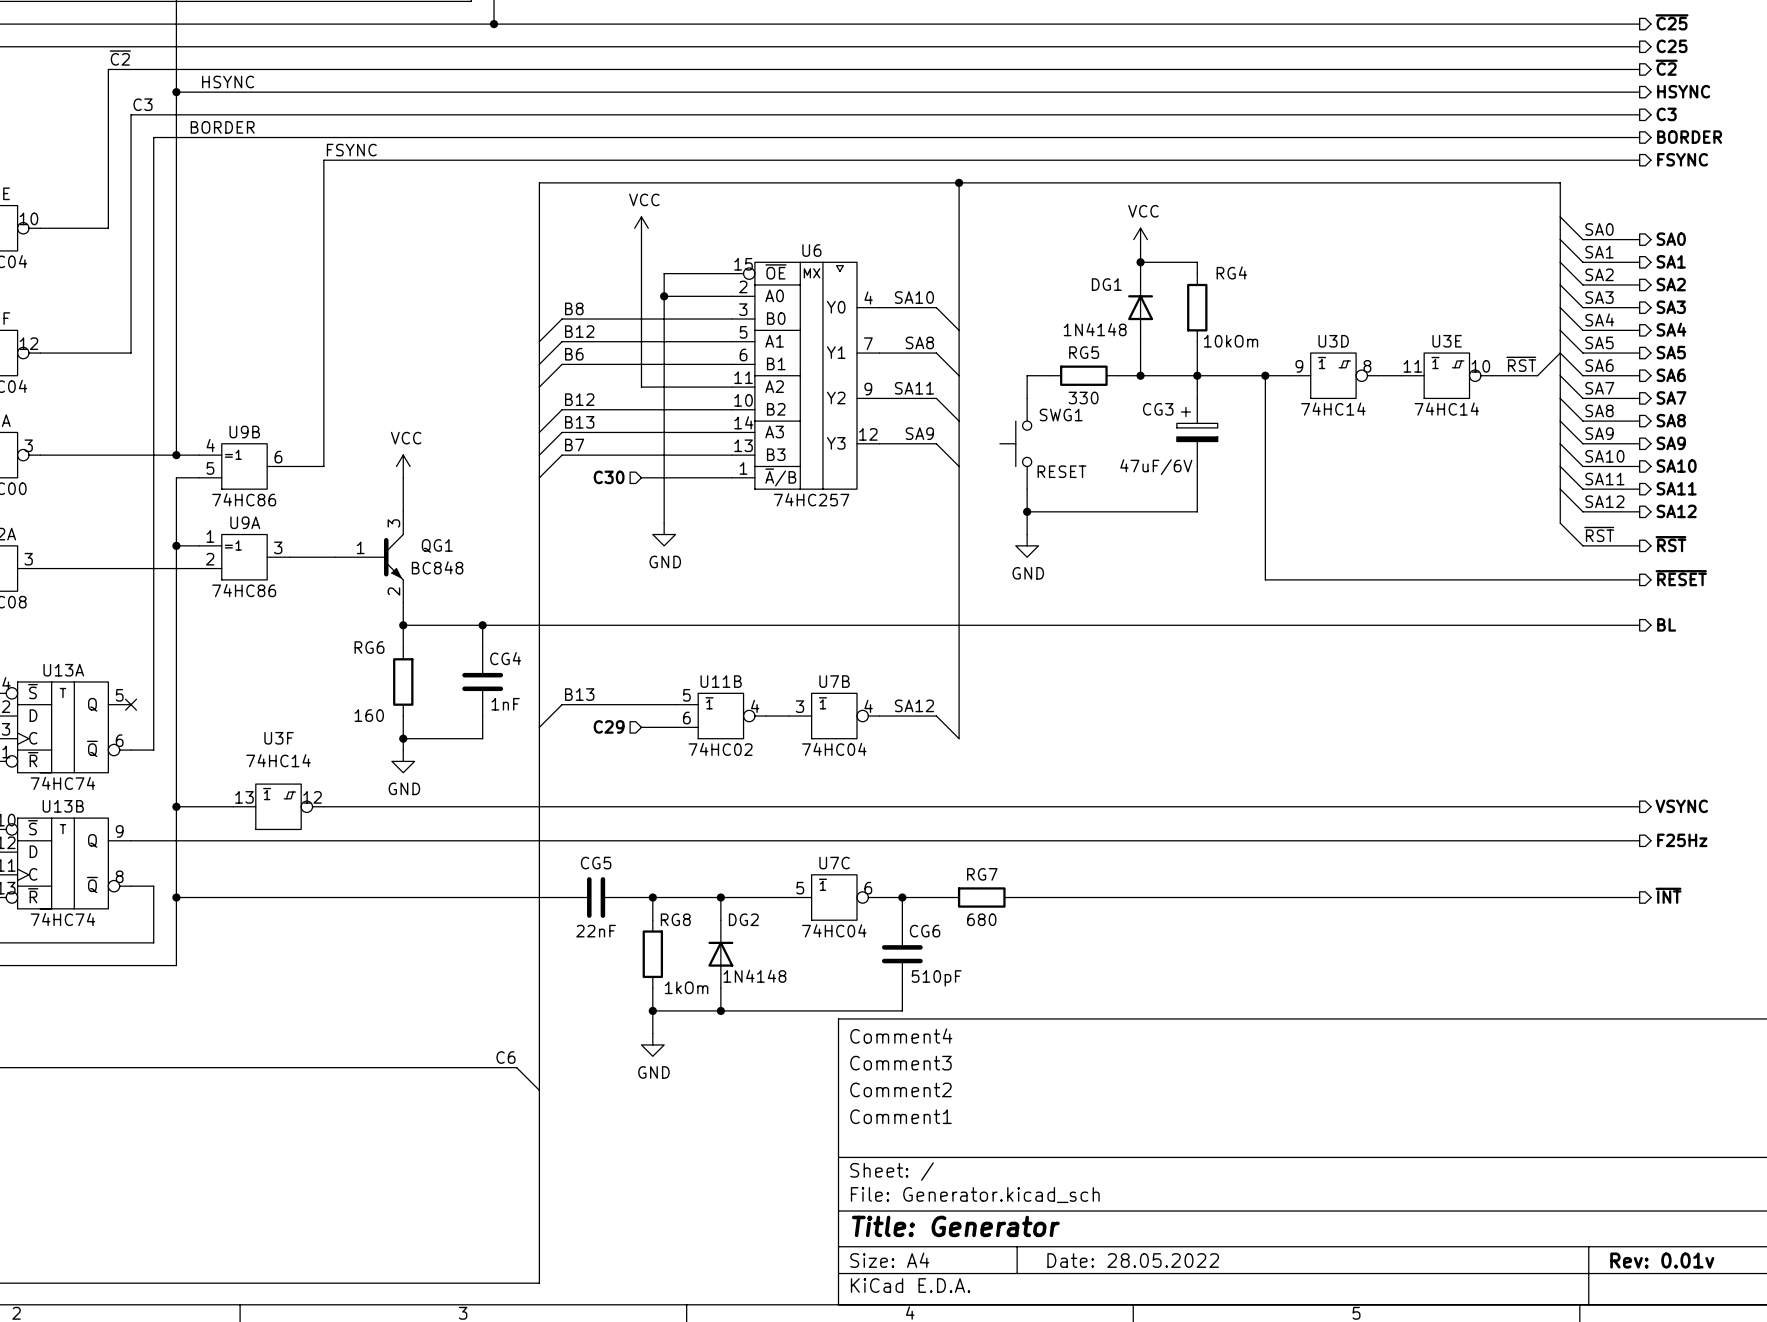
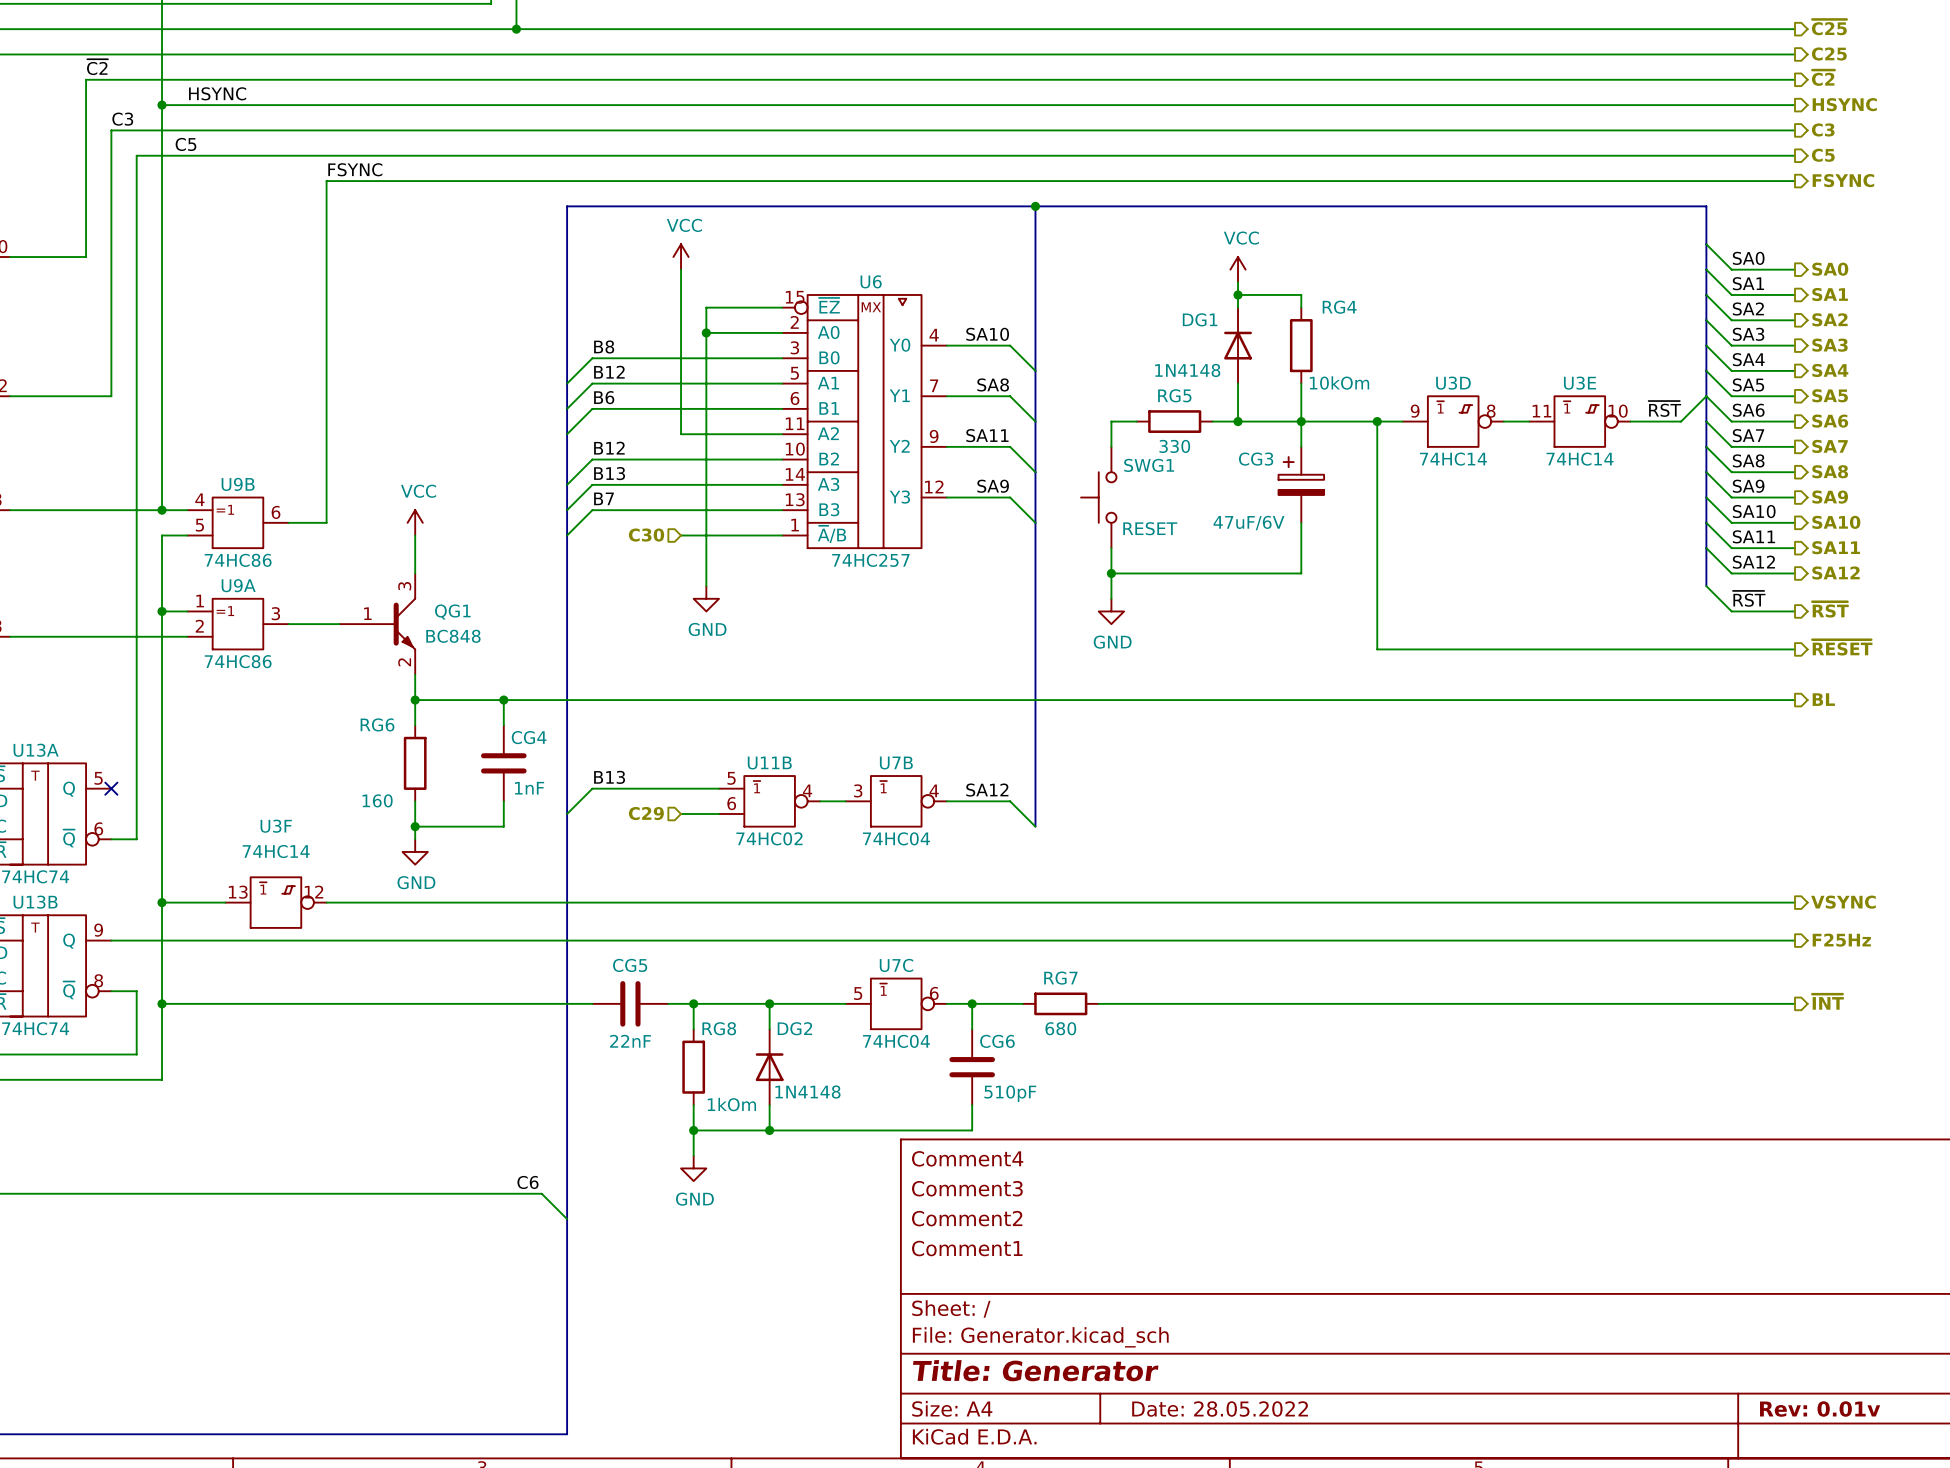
label: BORDER (222, 127) -> C5 (185, 144)
hierarchical label: BORDER (1689, 137) -> C5 (1823, 155)
U6 pin name: ~{OE} (775, 271) -> ~{EZ} (829, 305)

